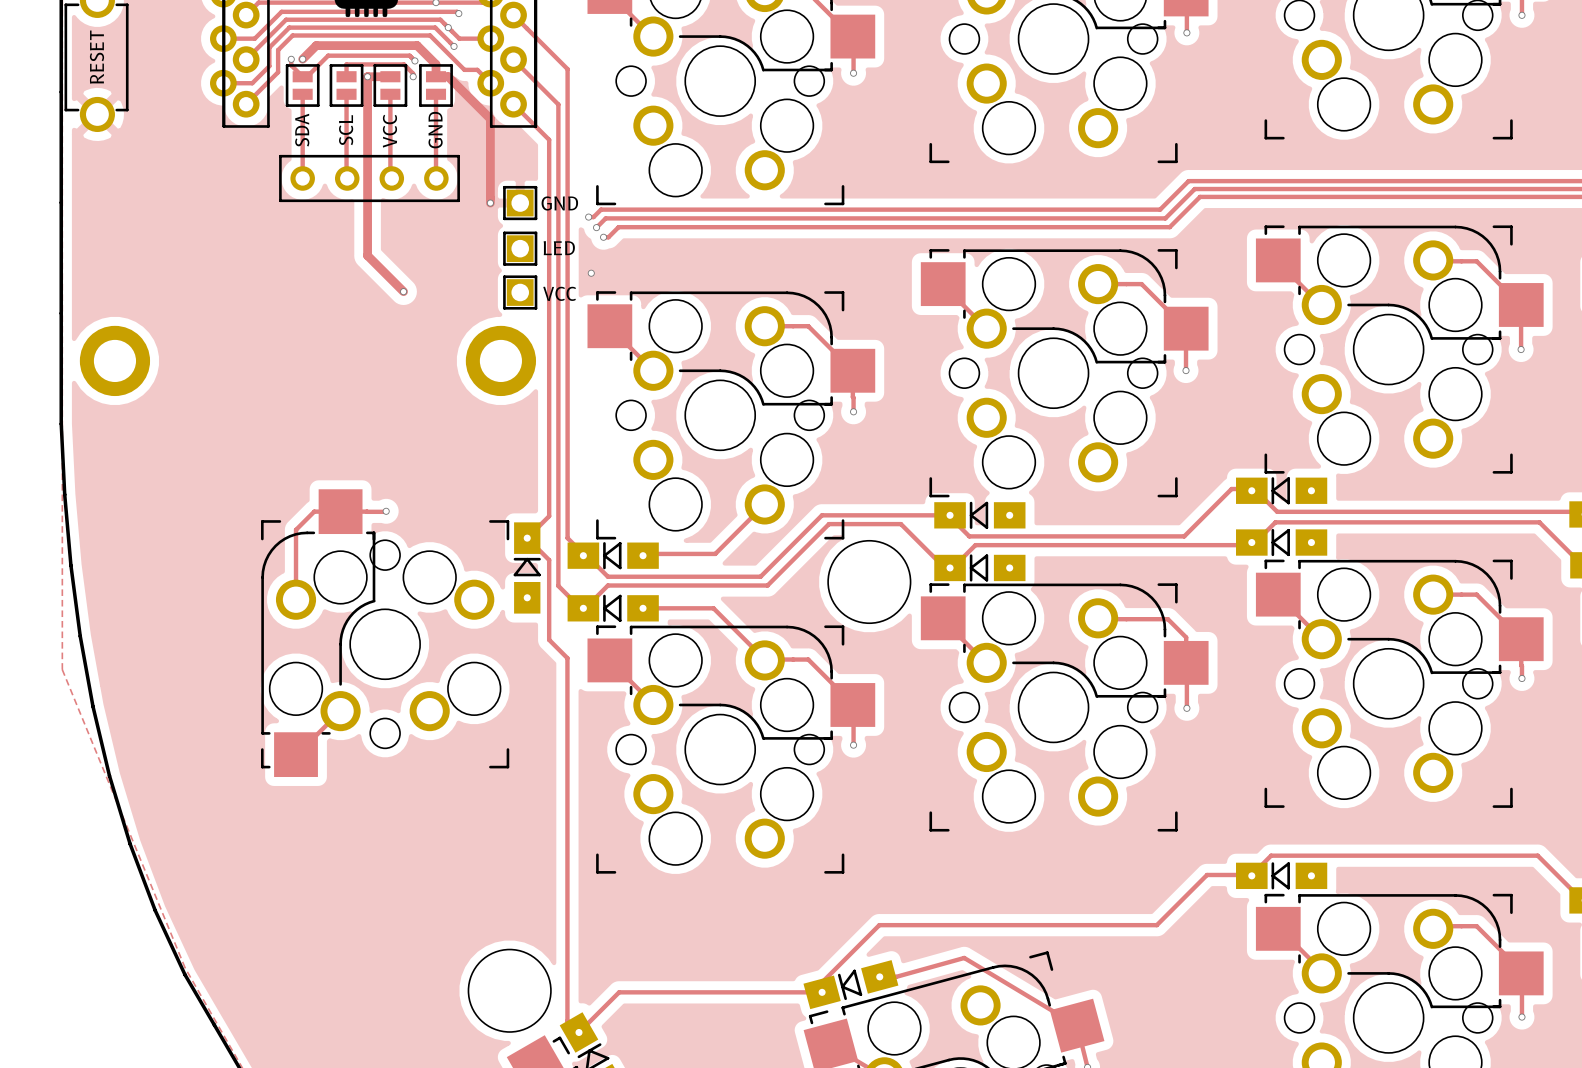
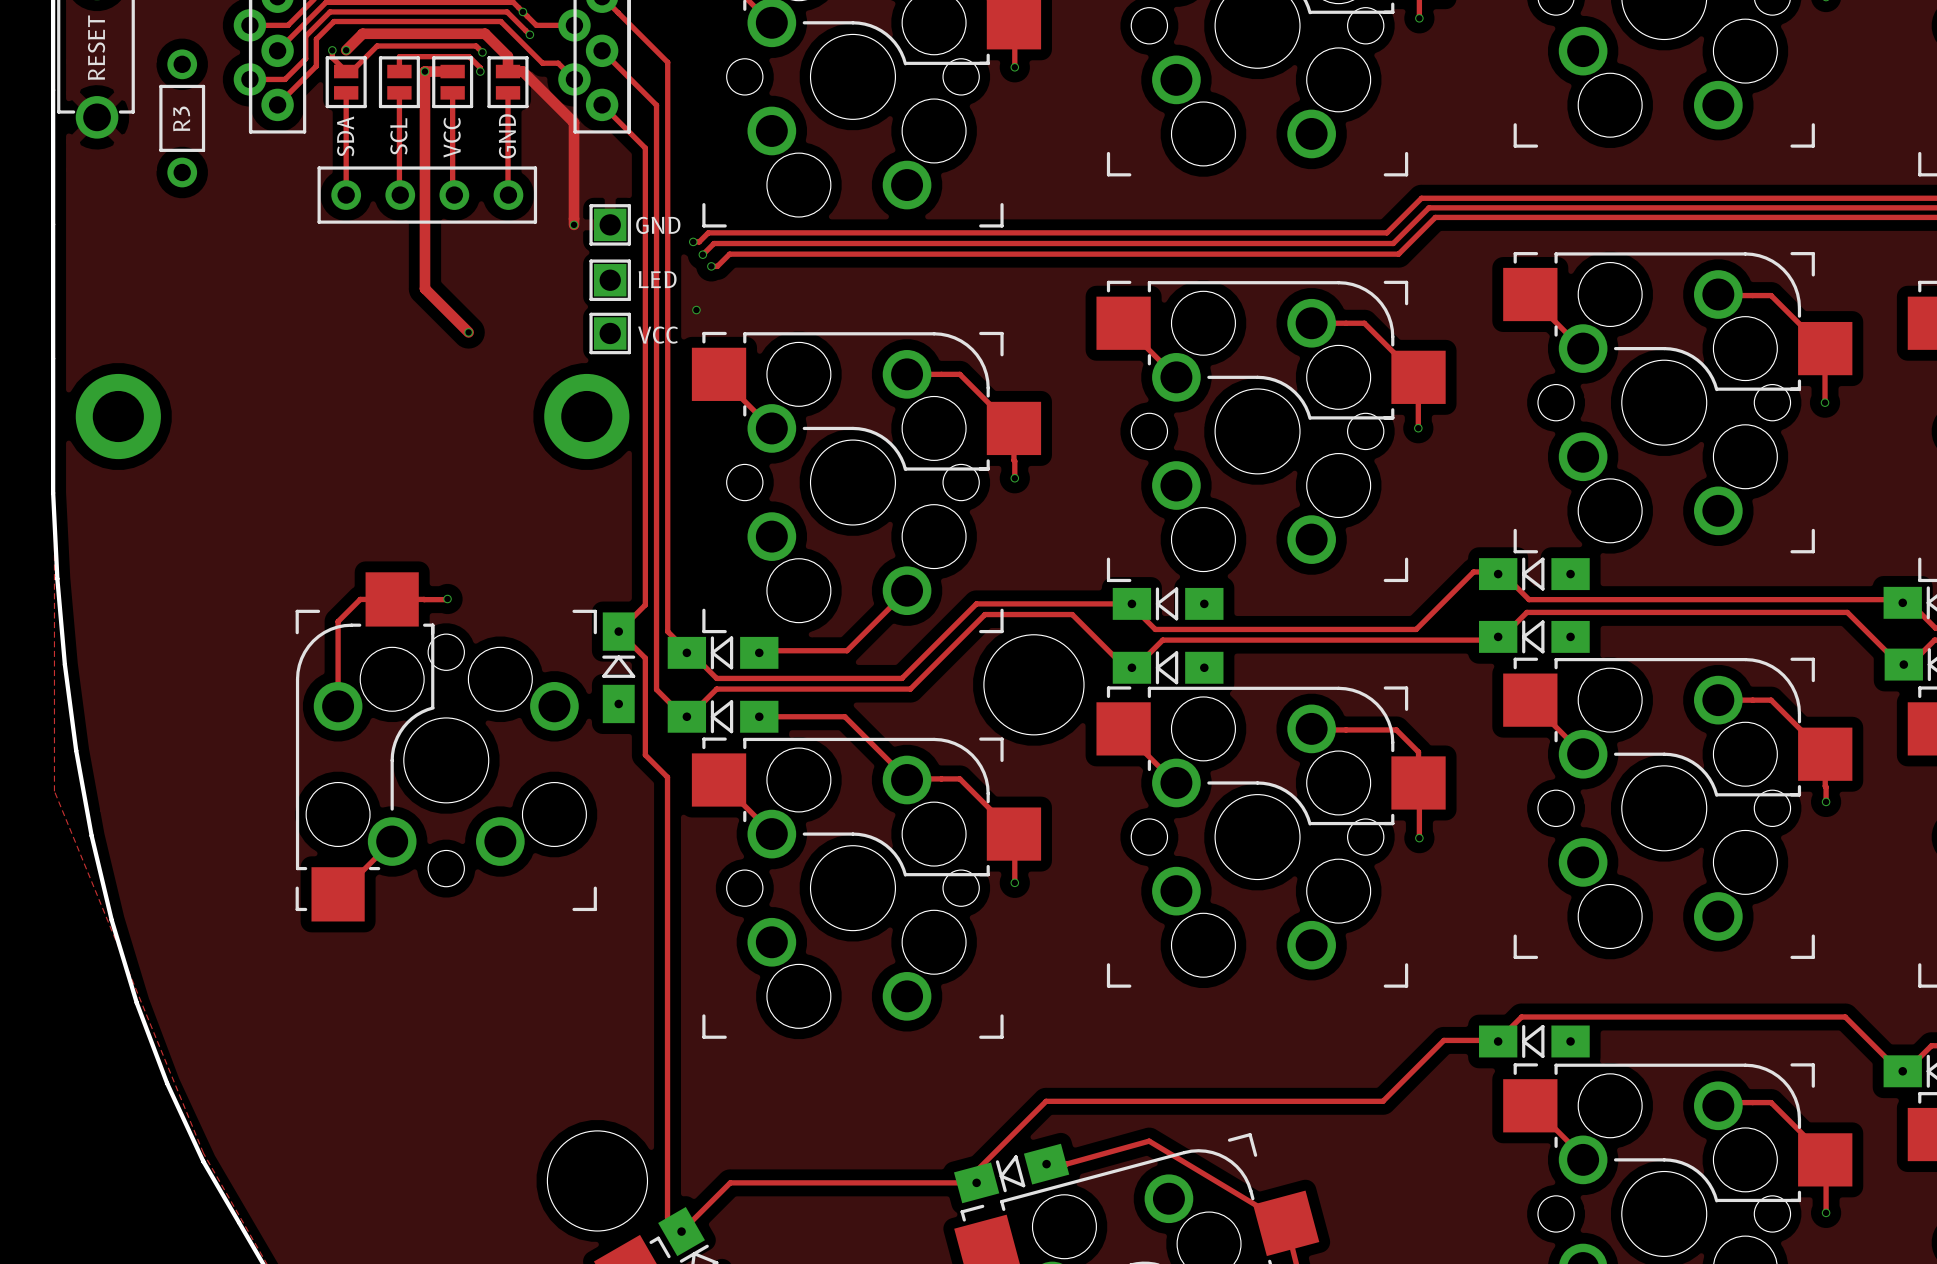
R3: none -> (182, 118)

